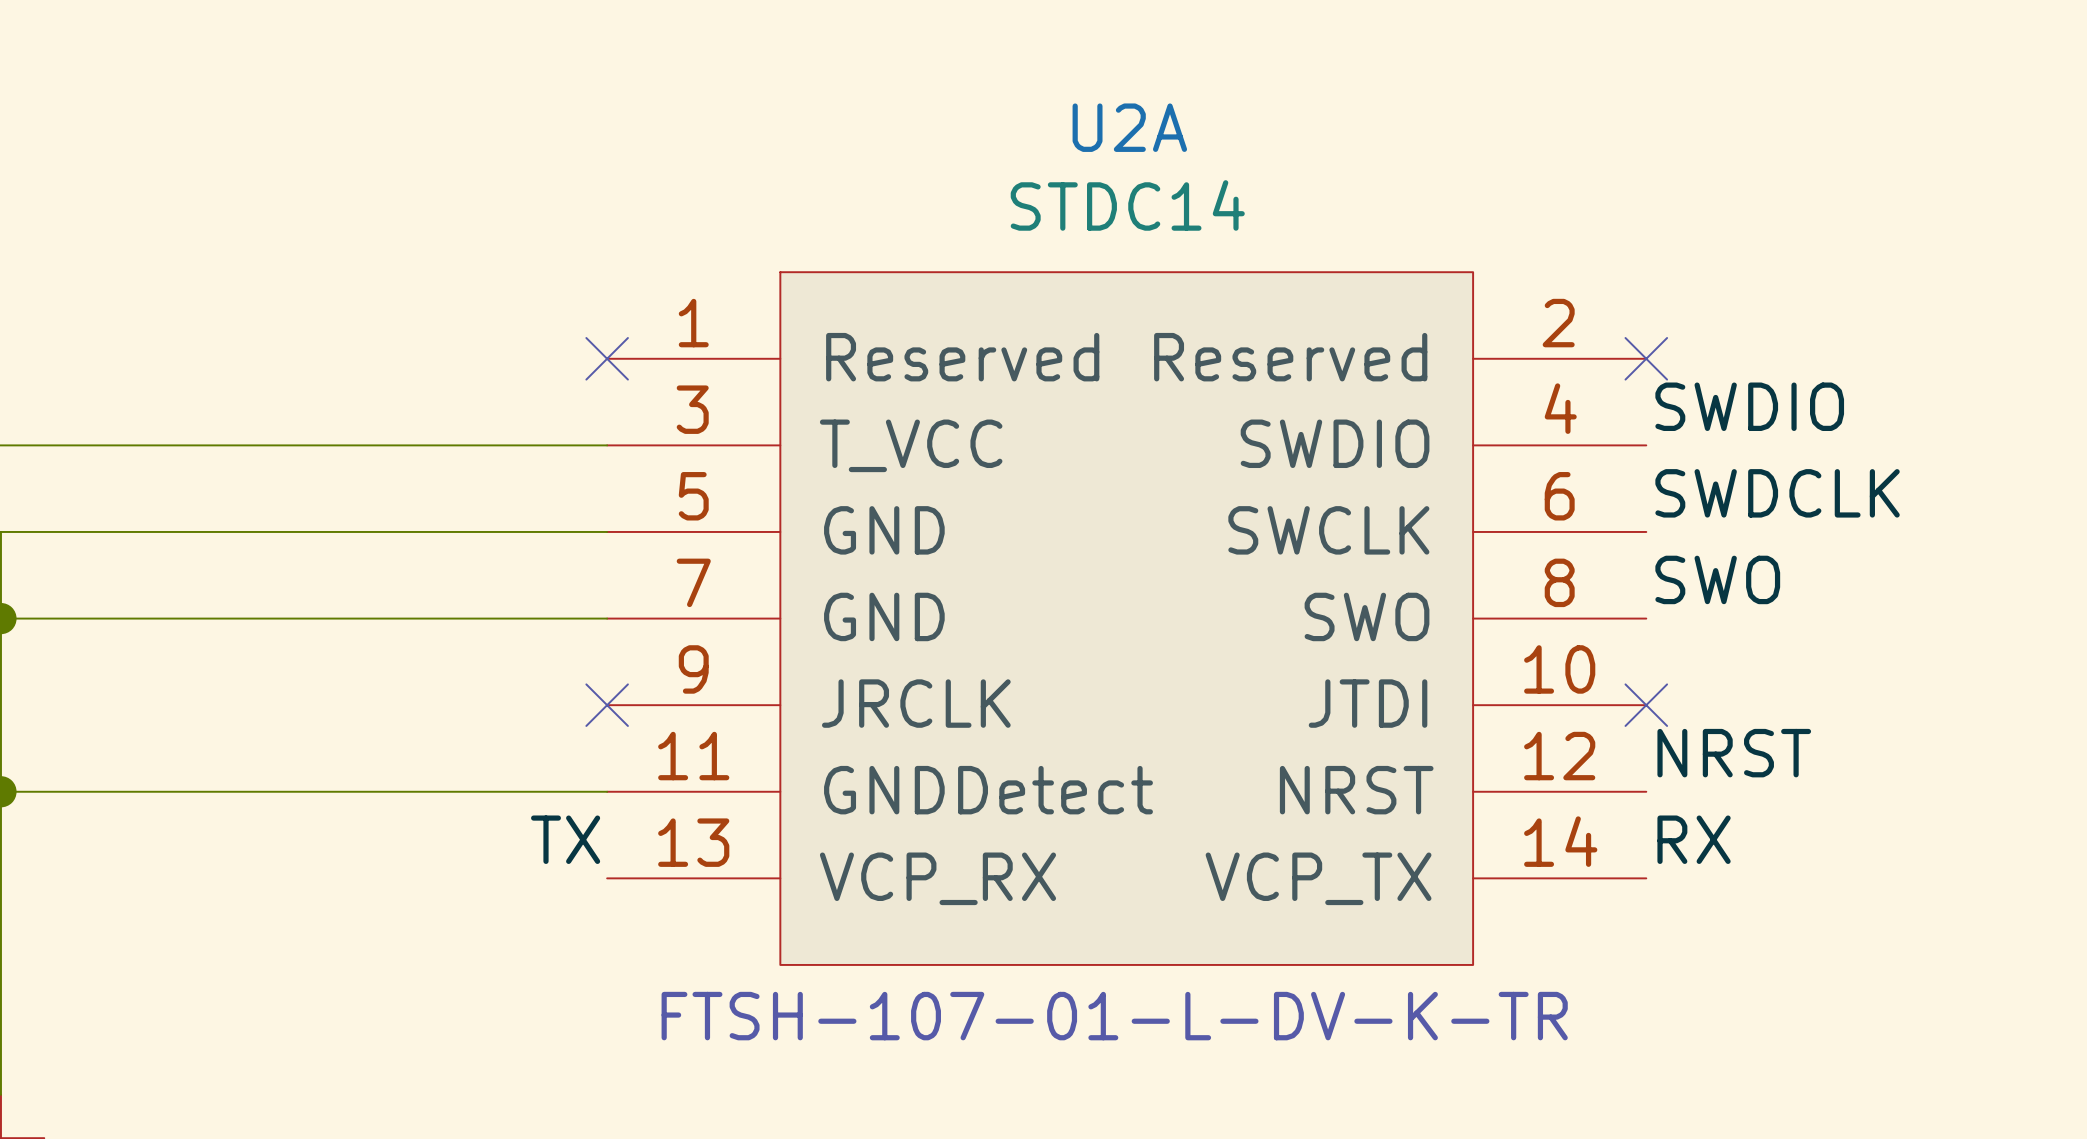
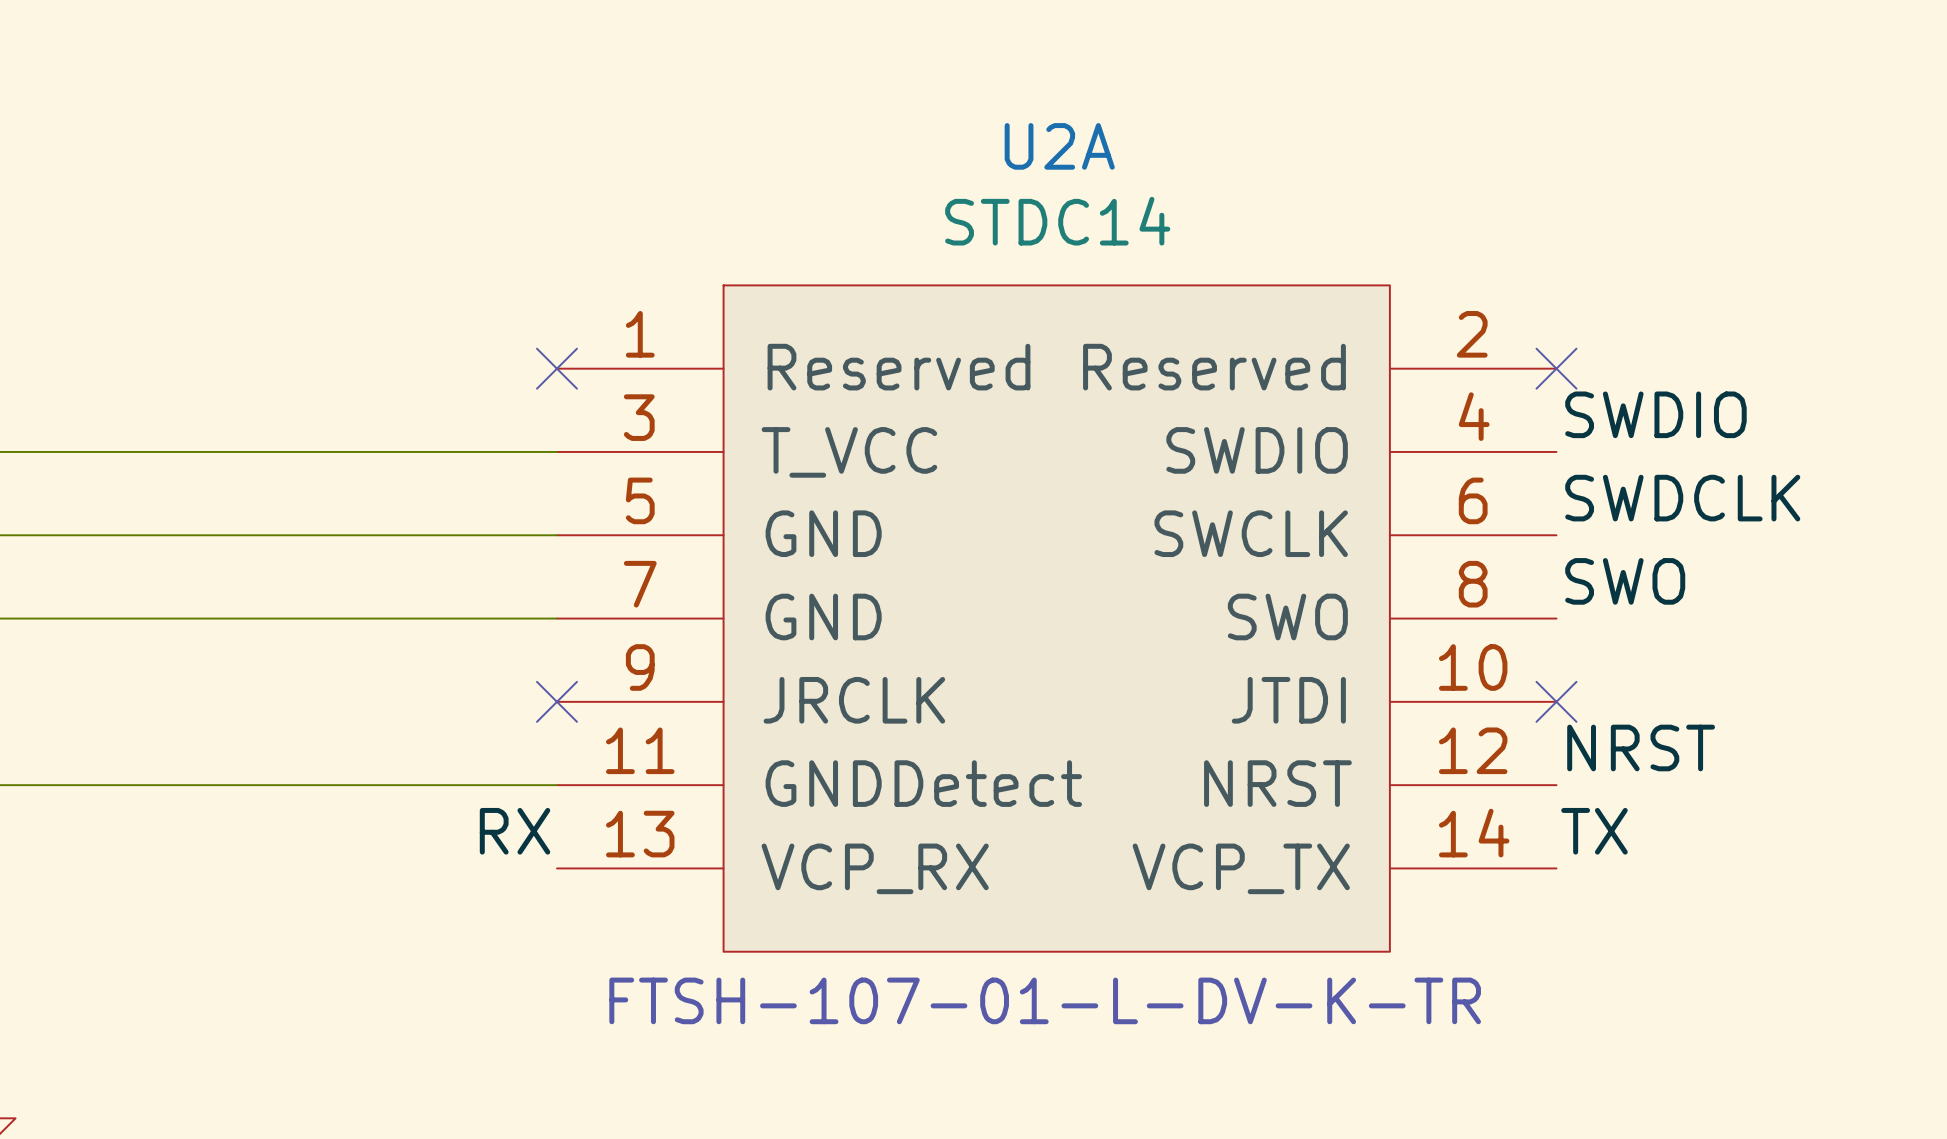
label: TX (565, 839) -> RX (515, 831)
label: RX (1694, 839) -> TX (1594, 831)

